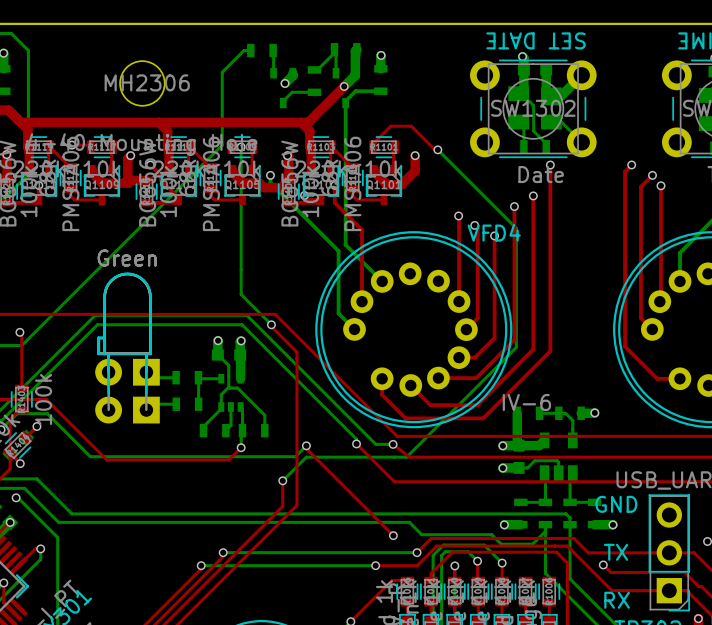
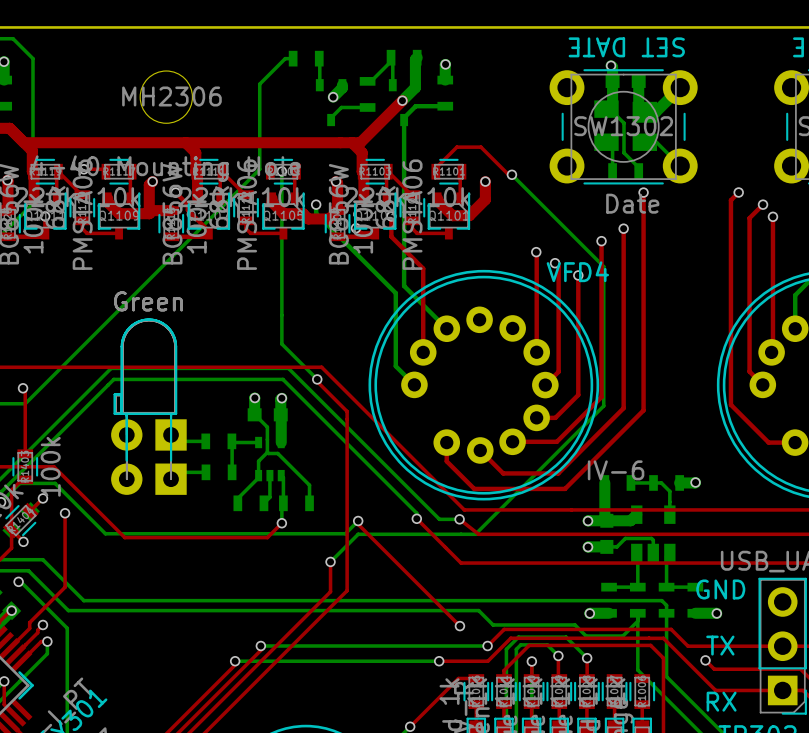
top track: none -> (65, 513) (65, 587) (29, 622) (29, 628) (9, 649)
via: none -> (65, 513)
top track: none -> (42, 624) (15, 655)
via: none -> (42, 624)

